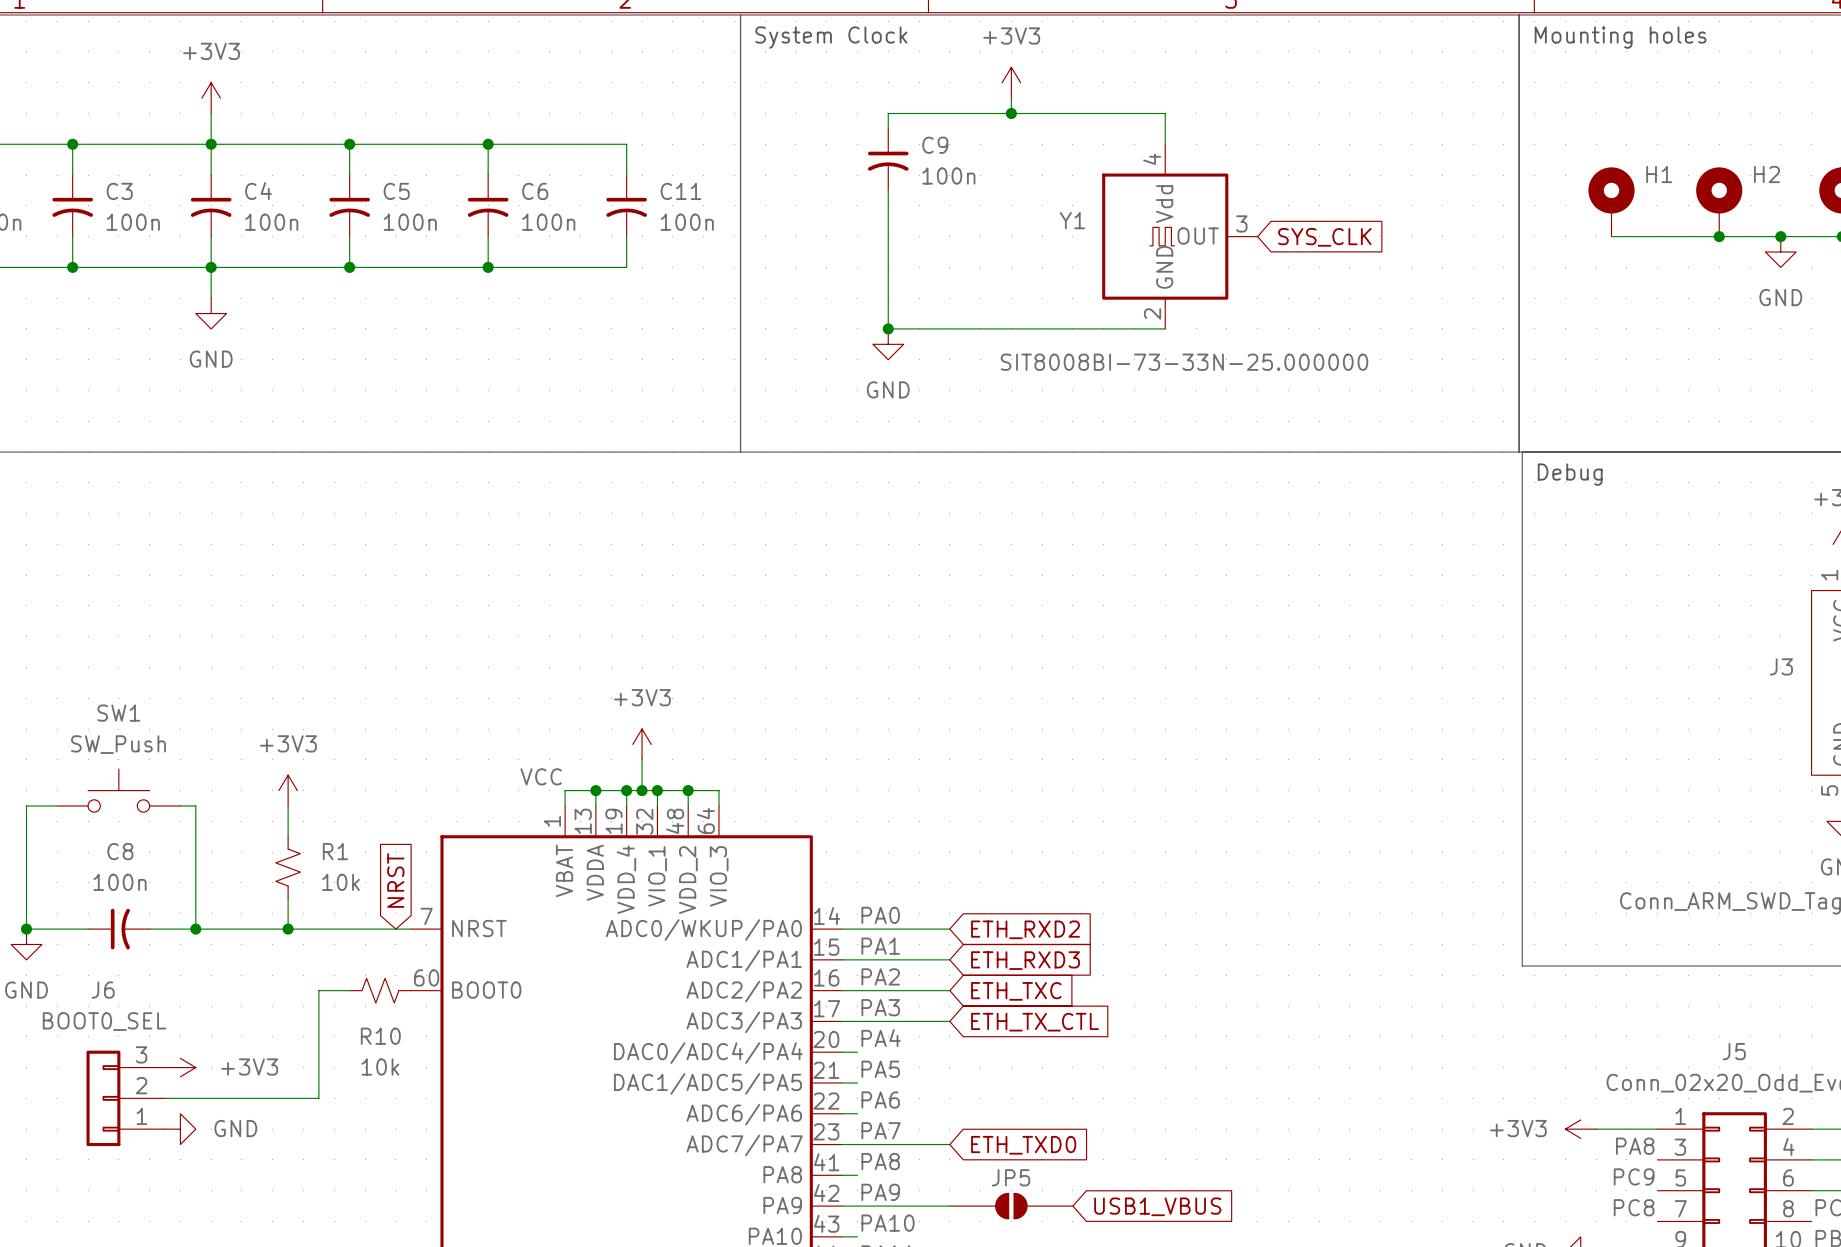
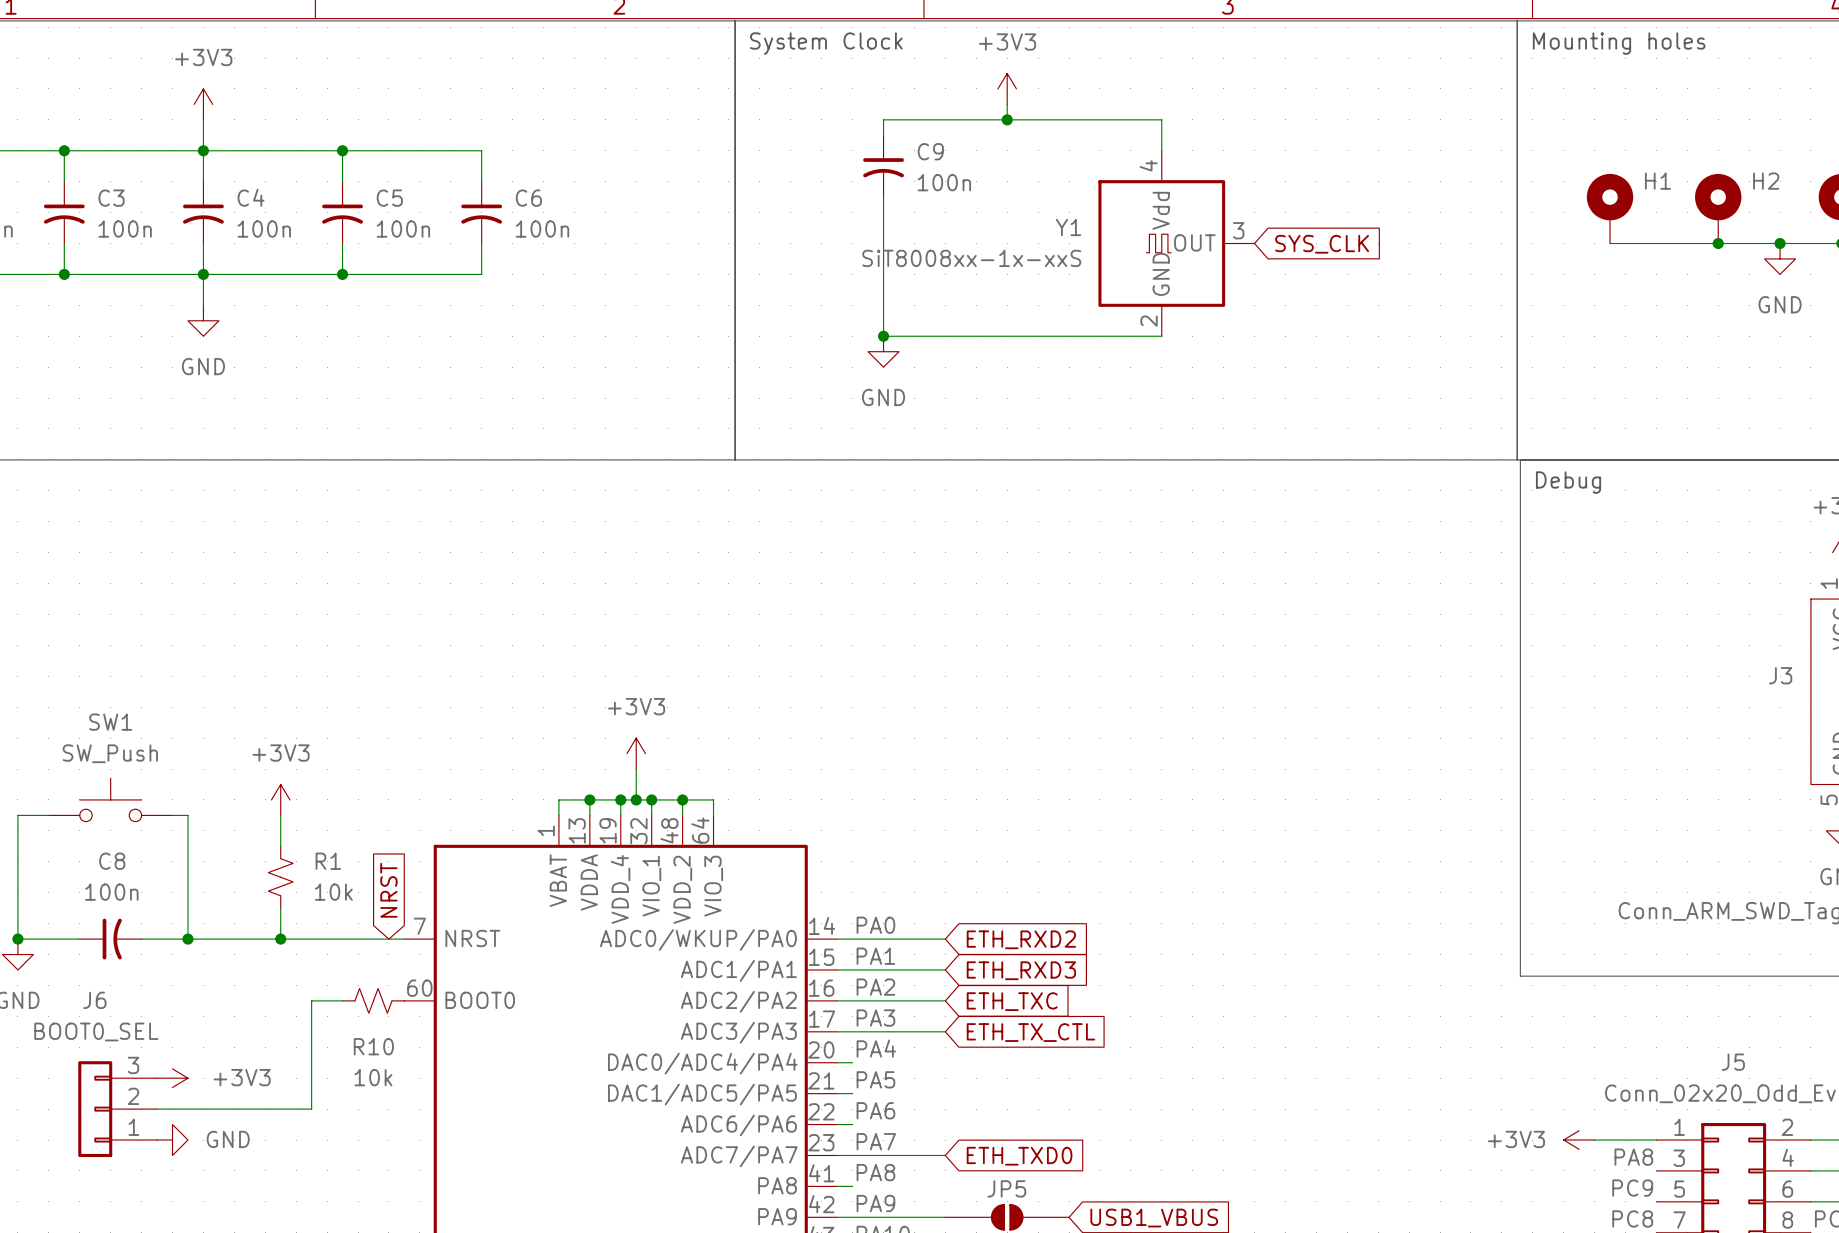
wire: (488, 144) (626, 144) (626, 175) -> none
junction: (488, 144) -> none
C11: 100n (626, 205) -> none
wire: (626, 236) (626, 267) (488, 267) -> none
junction: (488, 267) -> none
Y1 value: SIT8008BI-73-33N-25.000000 (1184, 362) -> SiT8008xx-1x-xxS (971, 258)
label: VCC (541, 776) -> none

